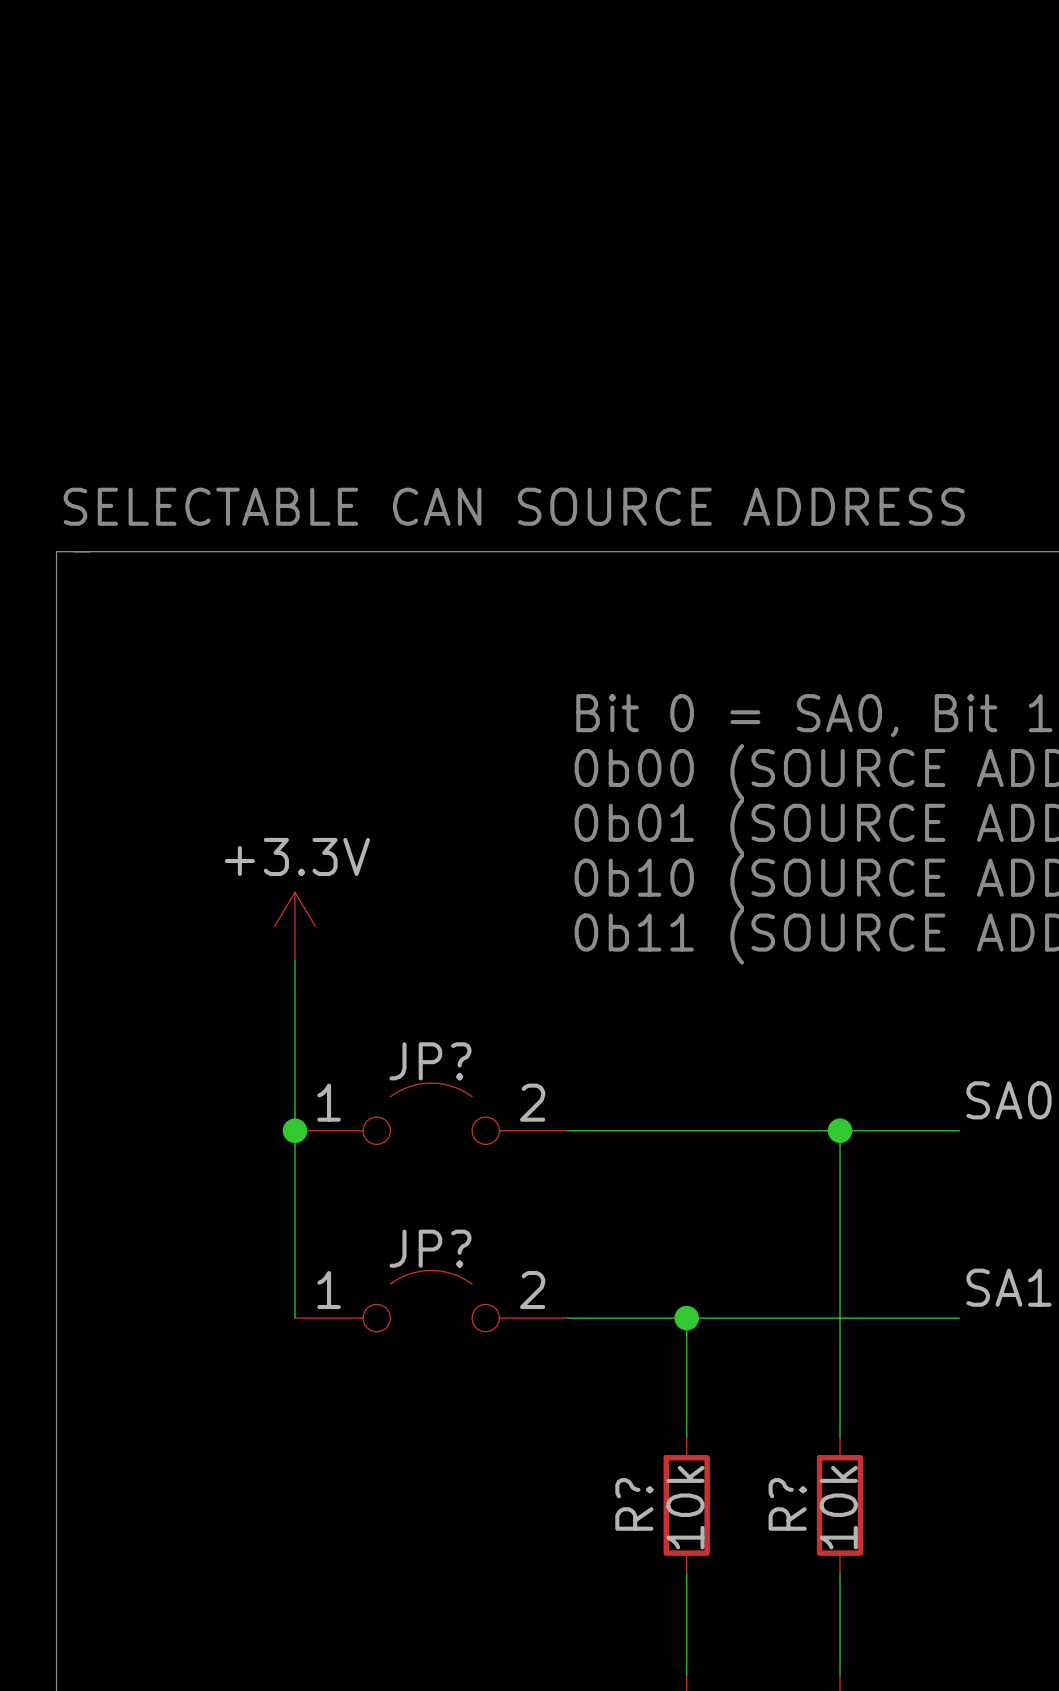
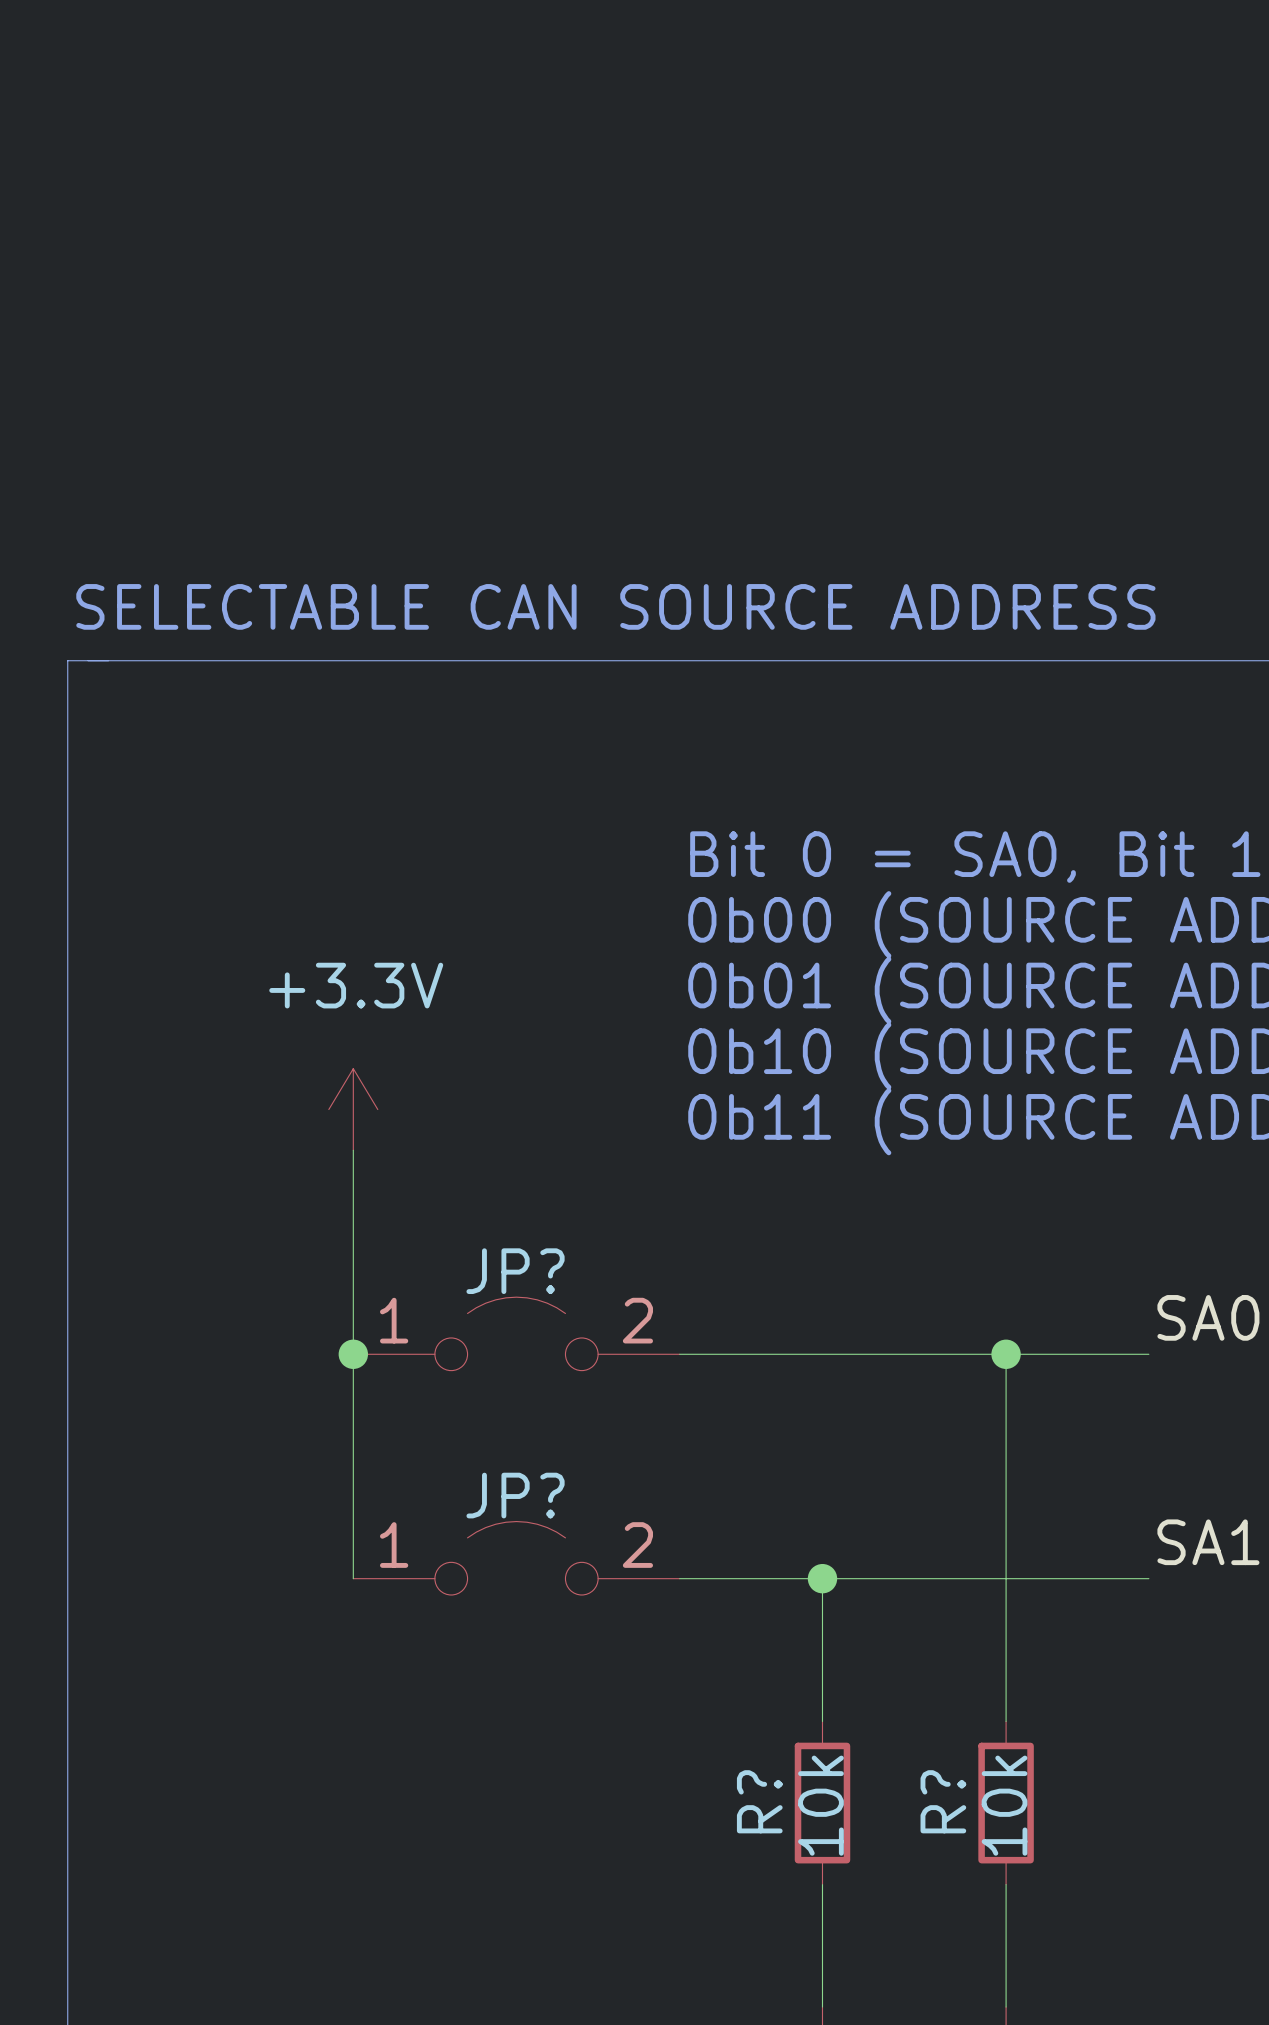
power symbol text position: +3.3V (297, 856) -> +3.3V (356, 985)

